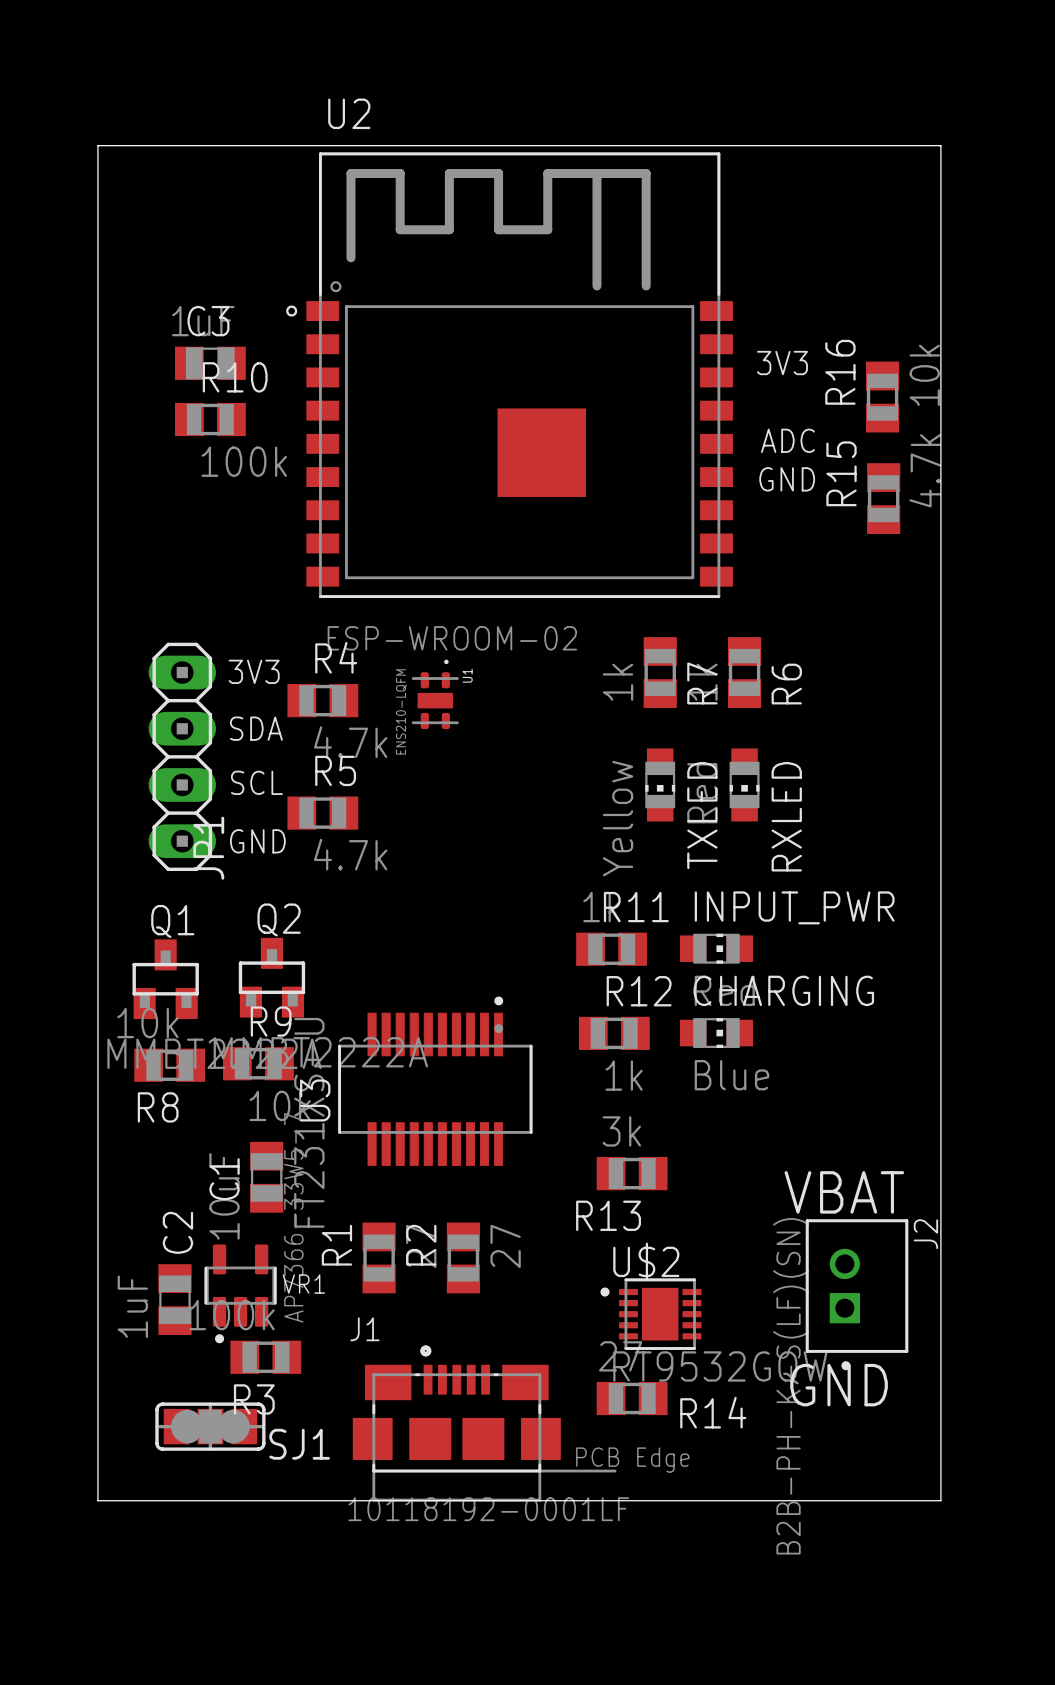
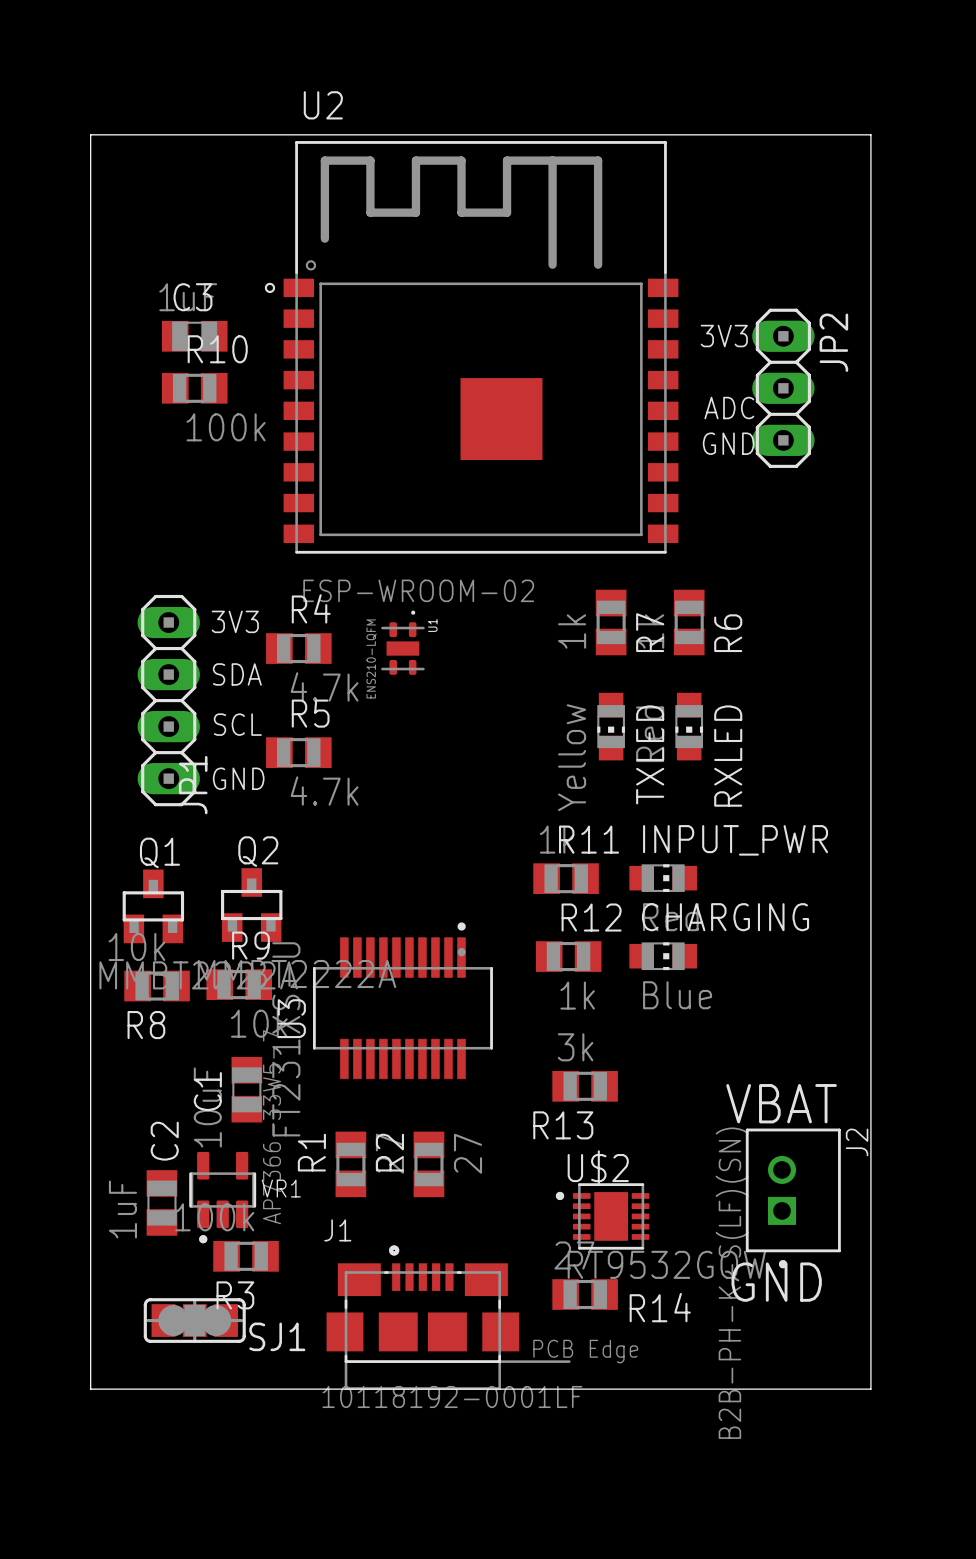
R16: 10k (882, 397) -> none
JP2: none -> (783, 388)
R15: 4.7k (883, 498) -> none

